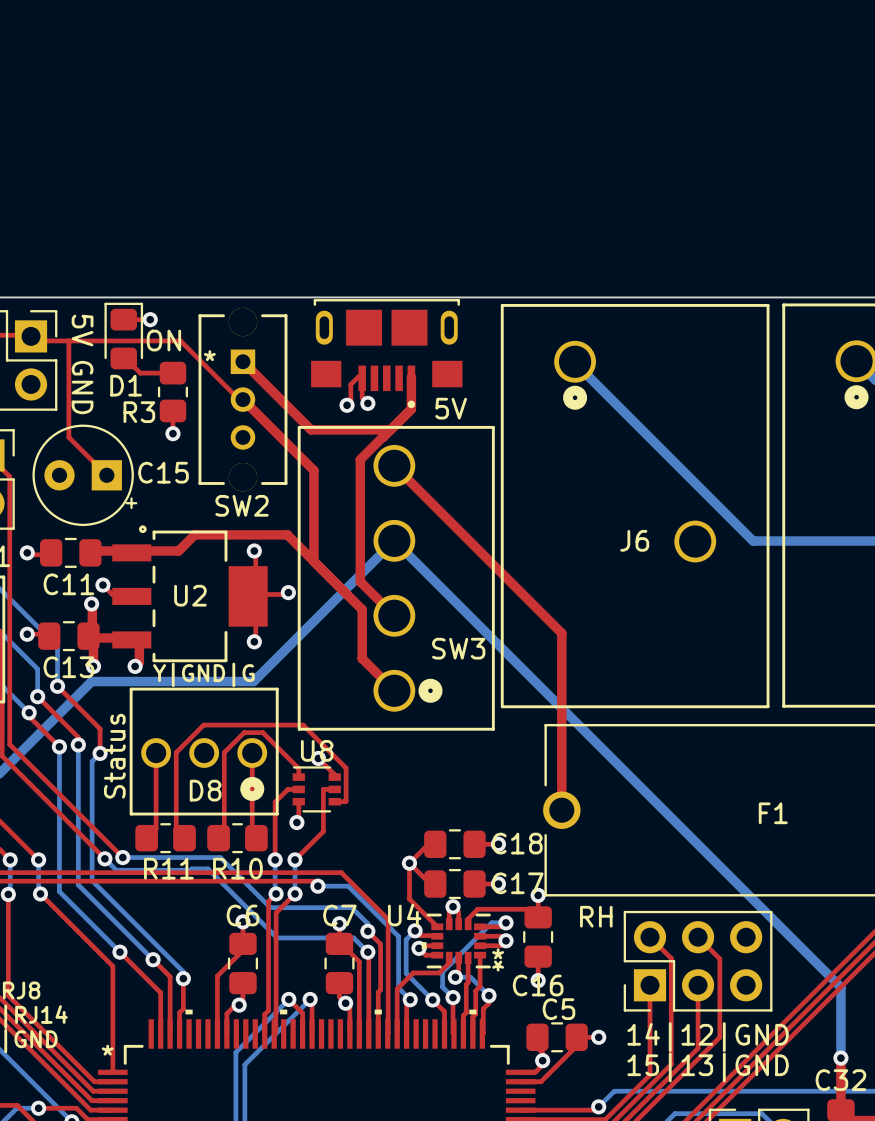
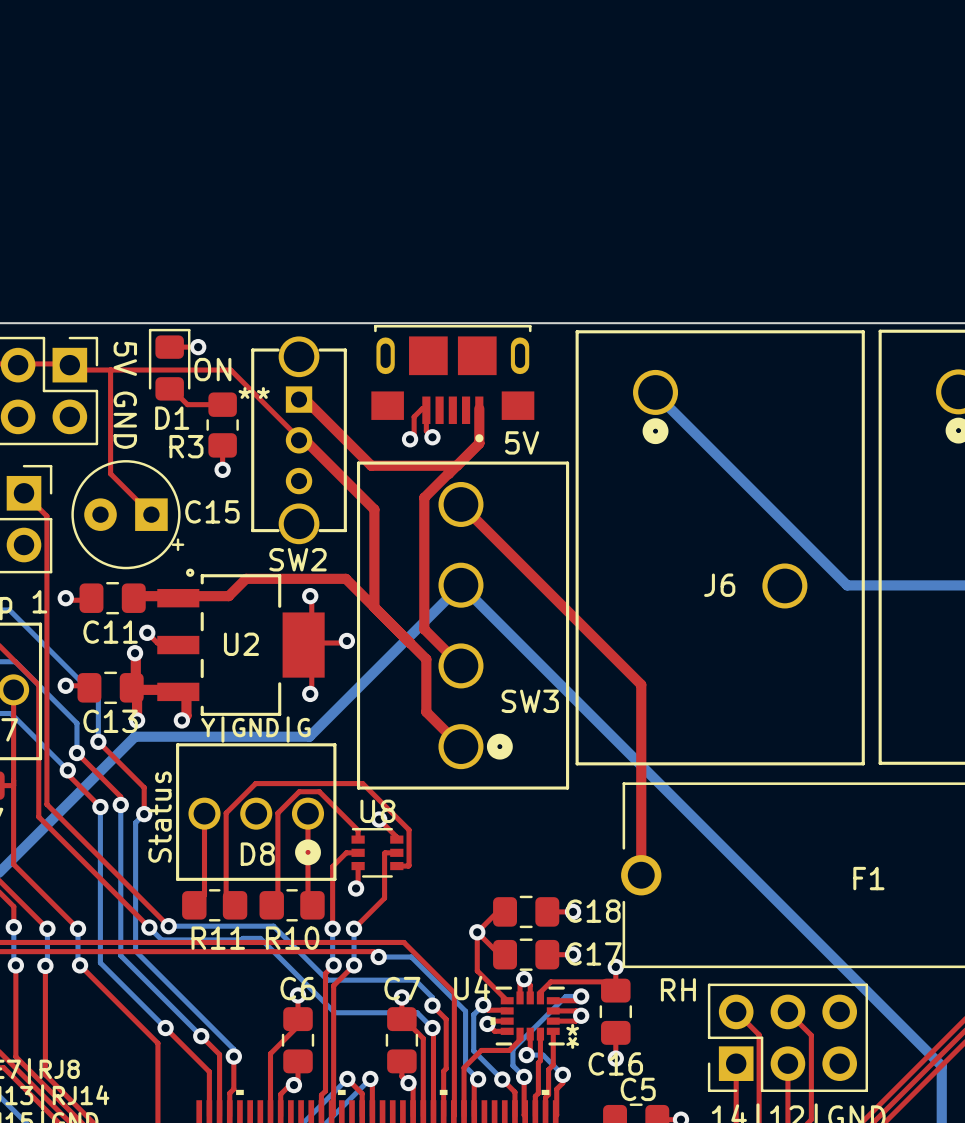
SW2 footprint: [198, 307, 288, 492] -> [251, 336, 347, 545]

